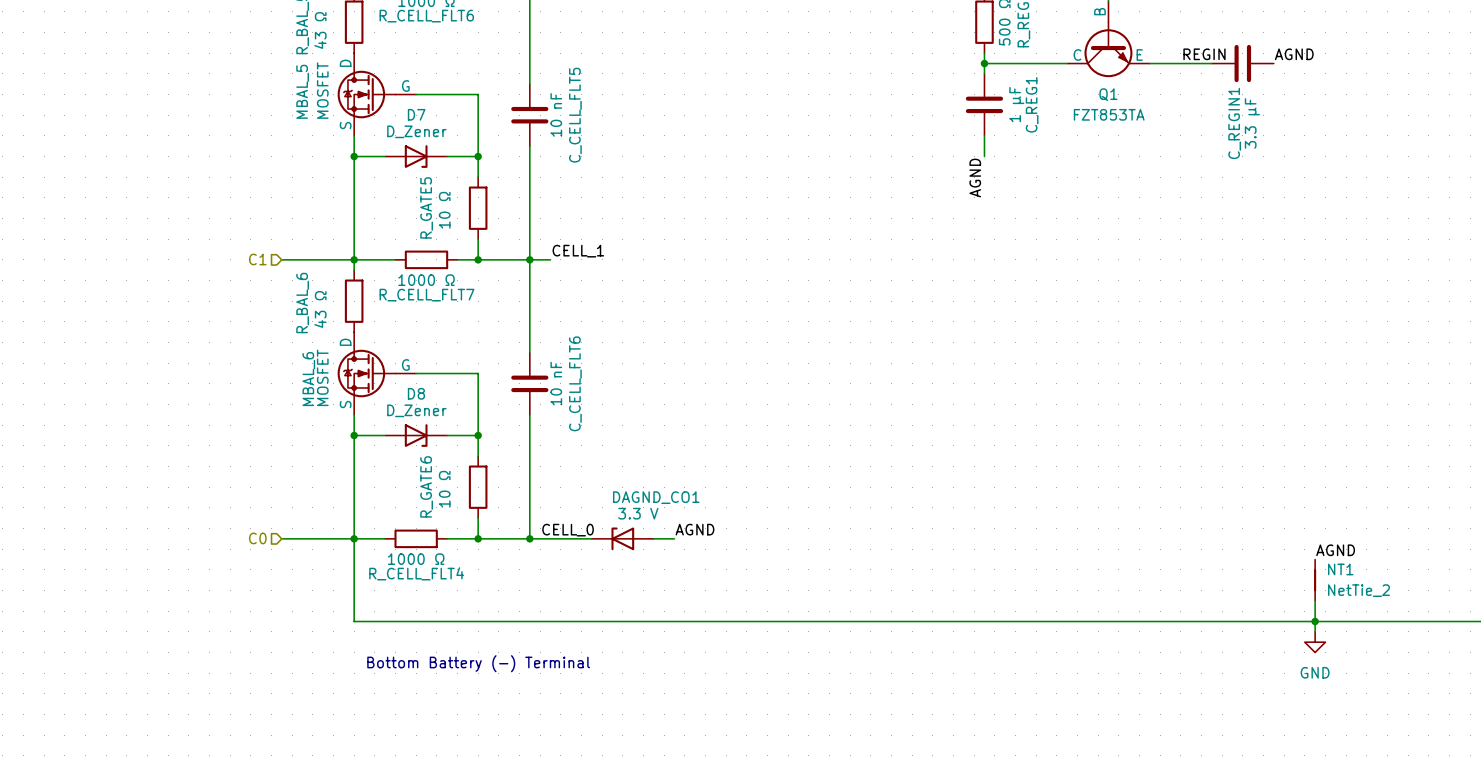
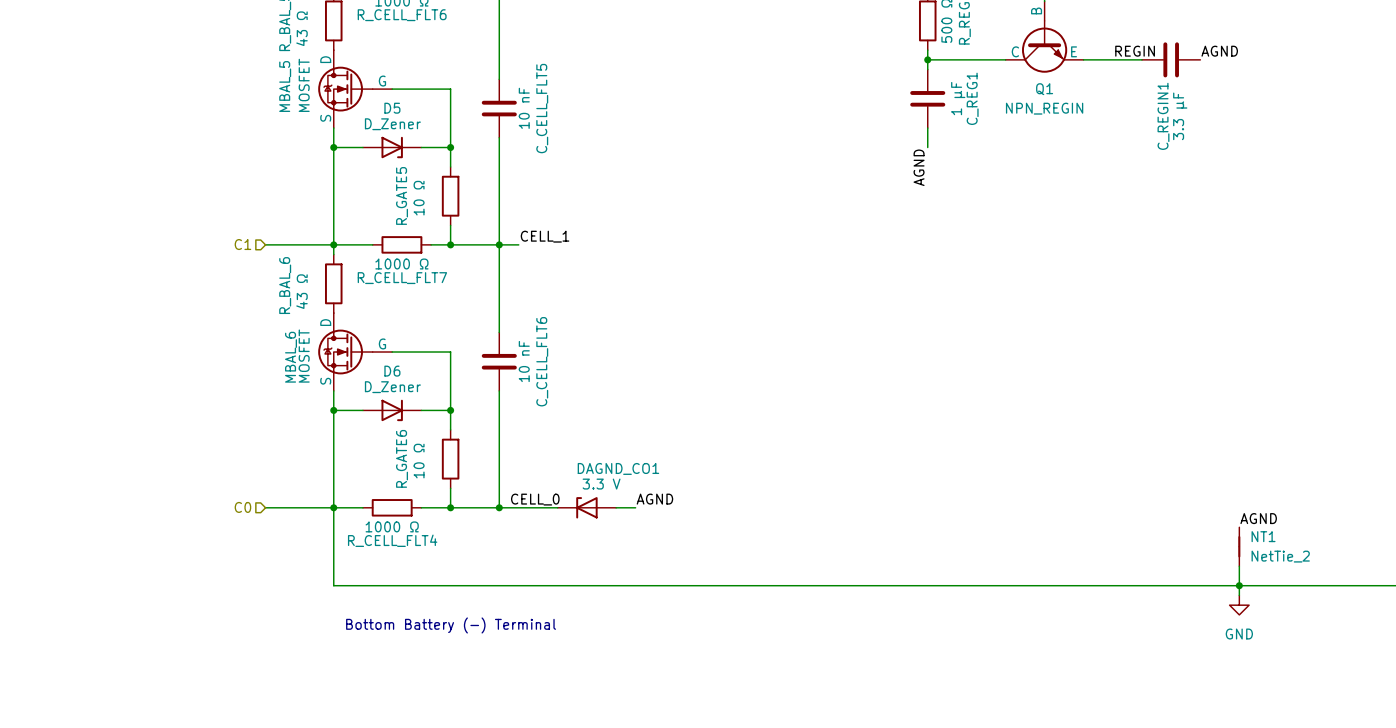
D7 name: D7 (416, 114) -> D5 (392, 108)
Q1 value: FZT853TA (1109, 114) -> NPN_REGIN (1044, 108)
D8 name: D8 (416, 393) -> D6 (392, 371)

